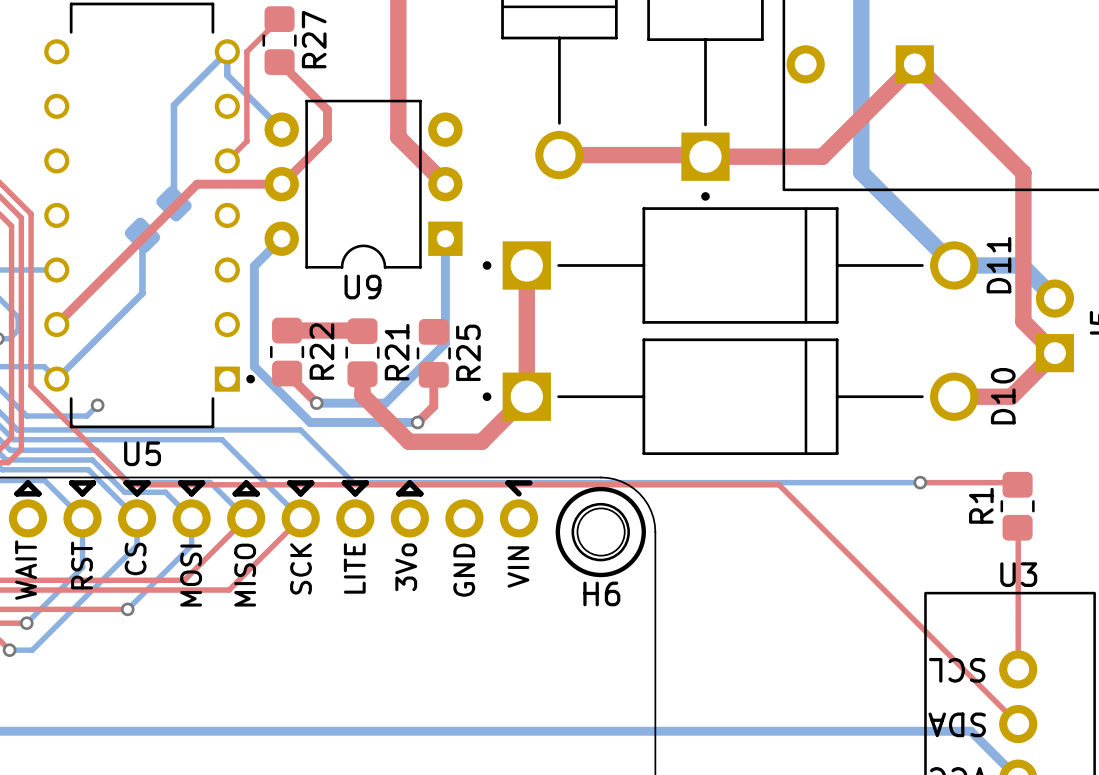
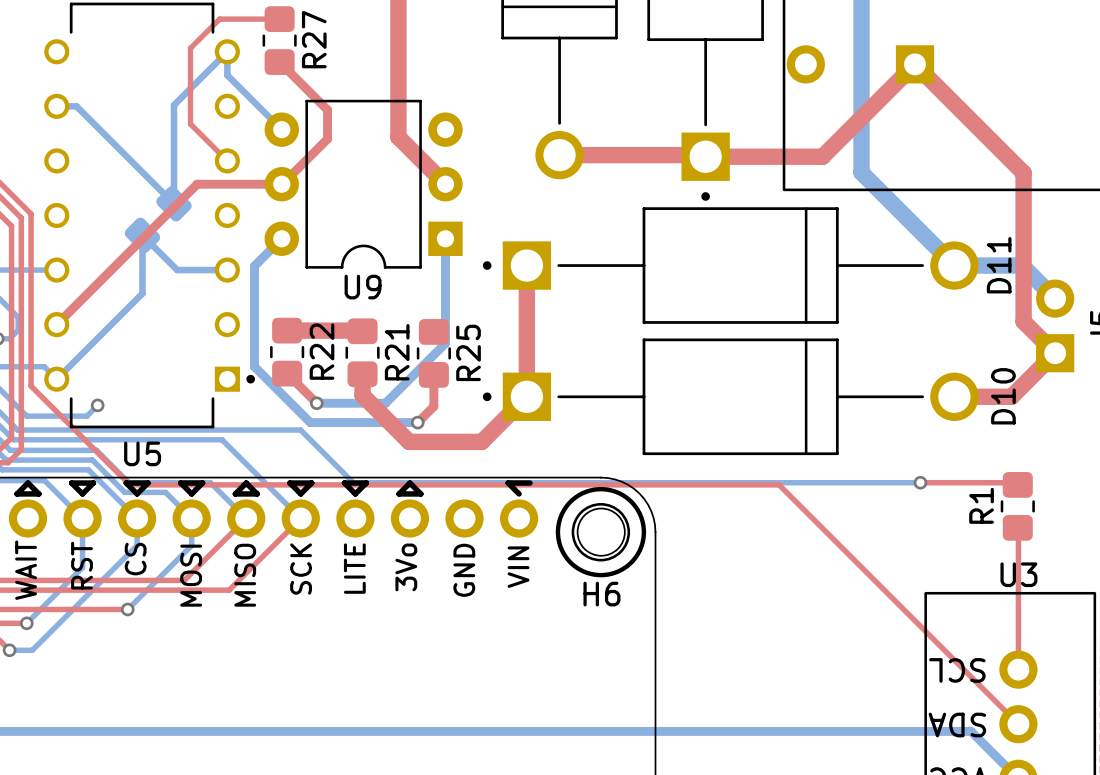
top track: (279, 19) (246, 51) (246, 141) (227, 160) -> (279, 19) (219, 19) (190, 48) (190, 124) (227, 160)
bottom track: none -> (56, 106) (76, 106) (174, 203)
bottom track: none -> (142, 235) (177, 270) (227, 270)

